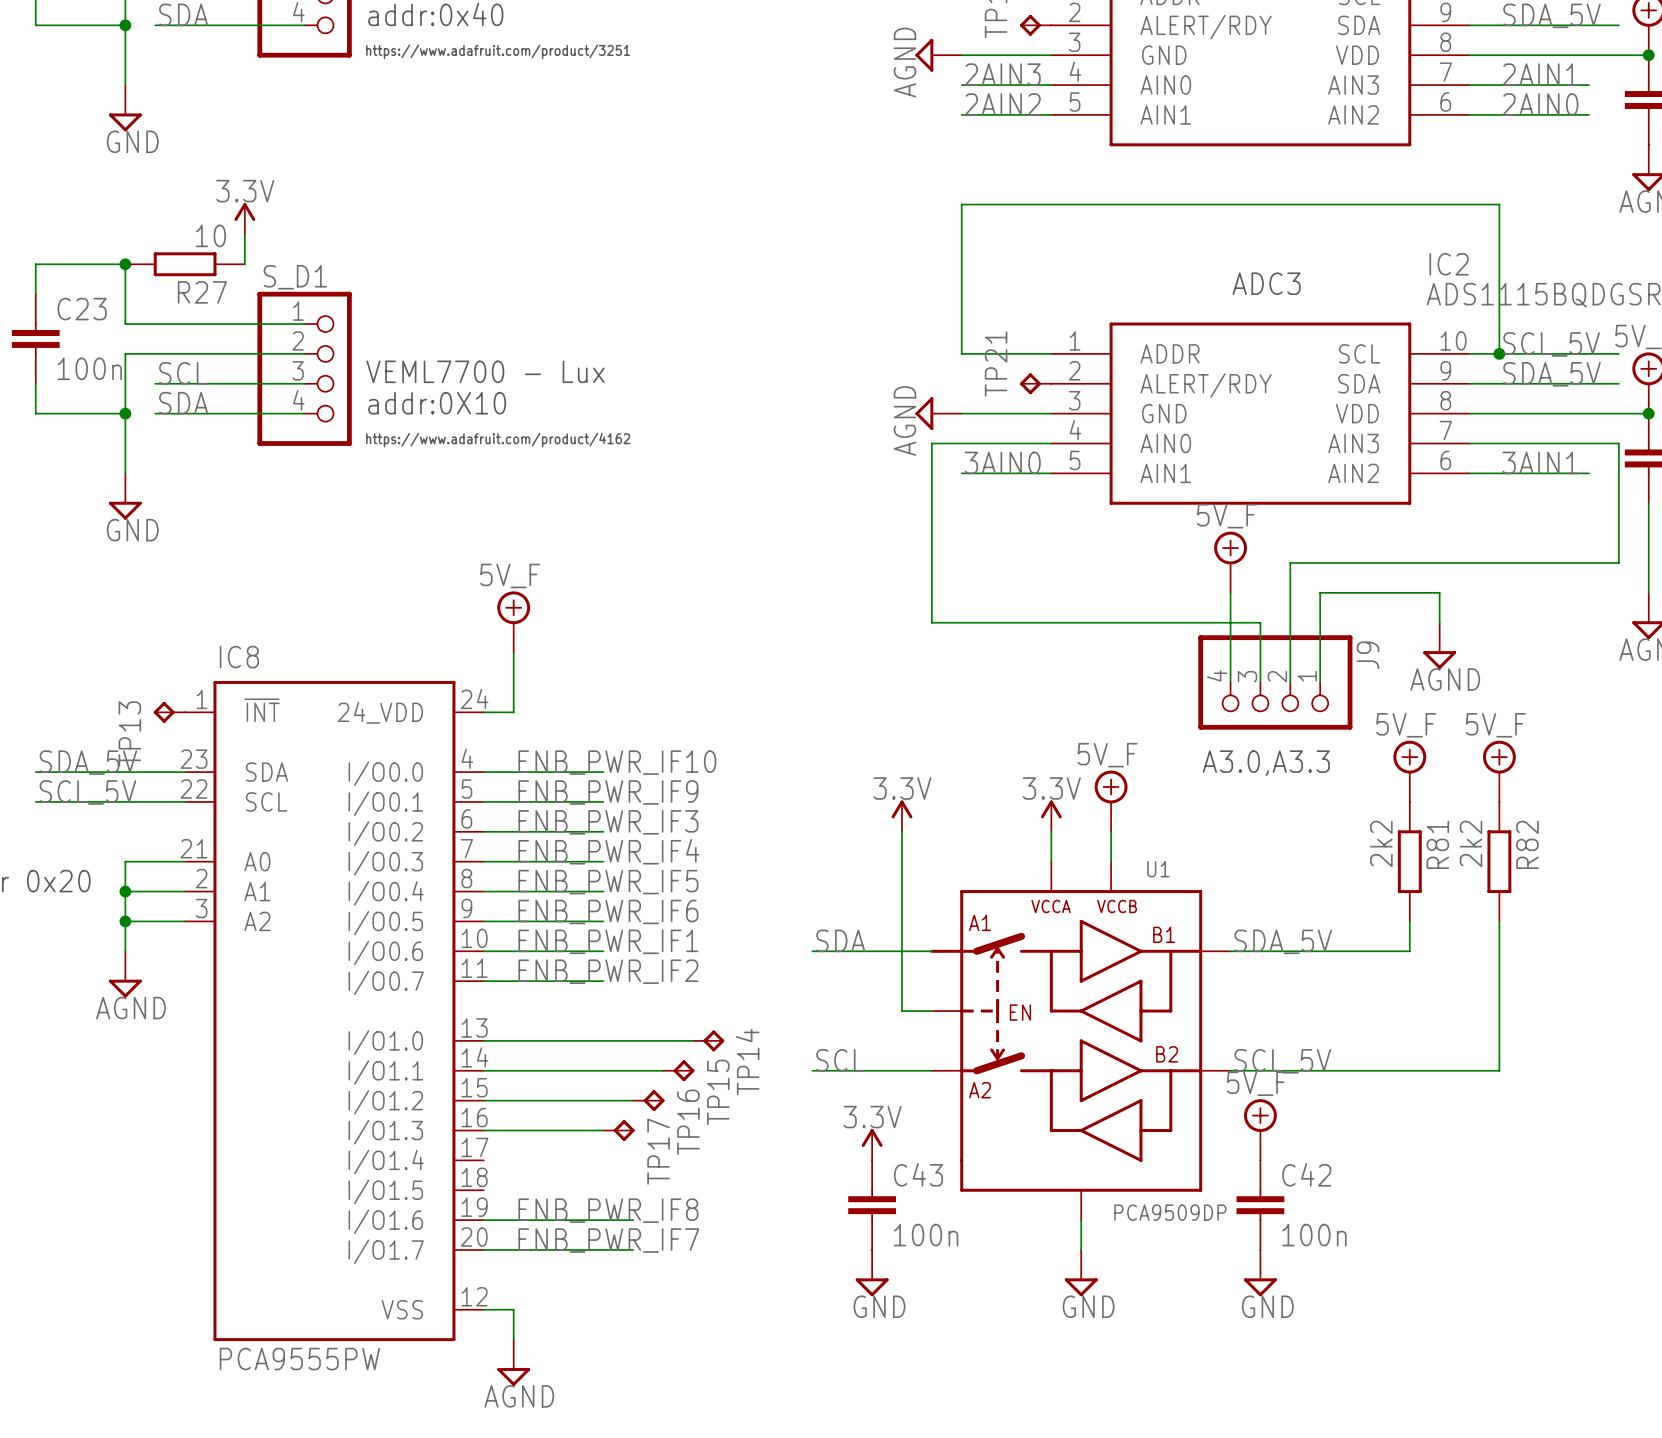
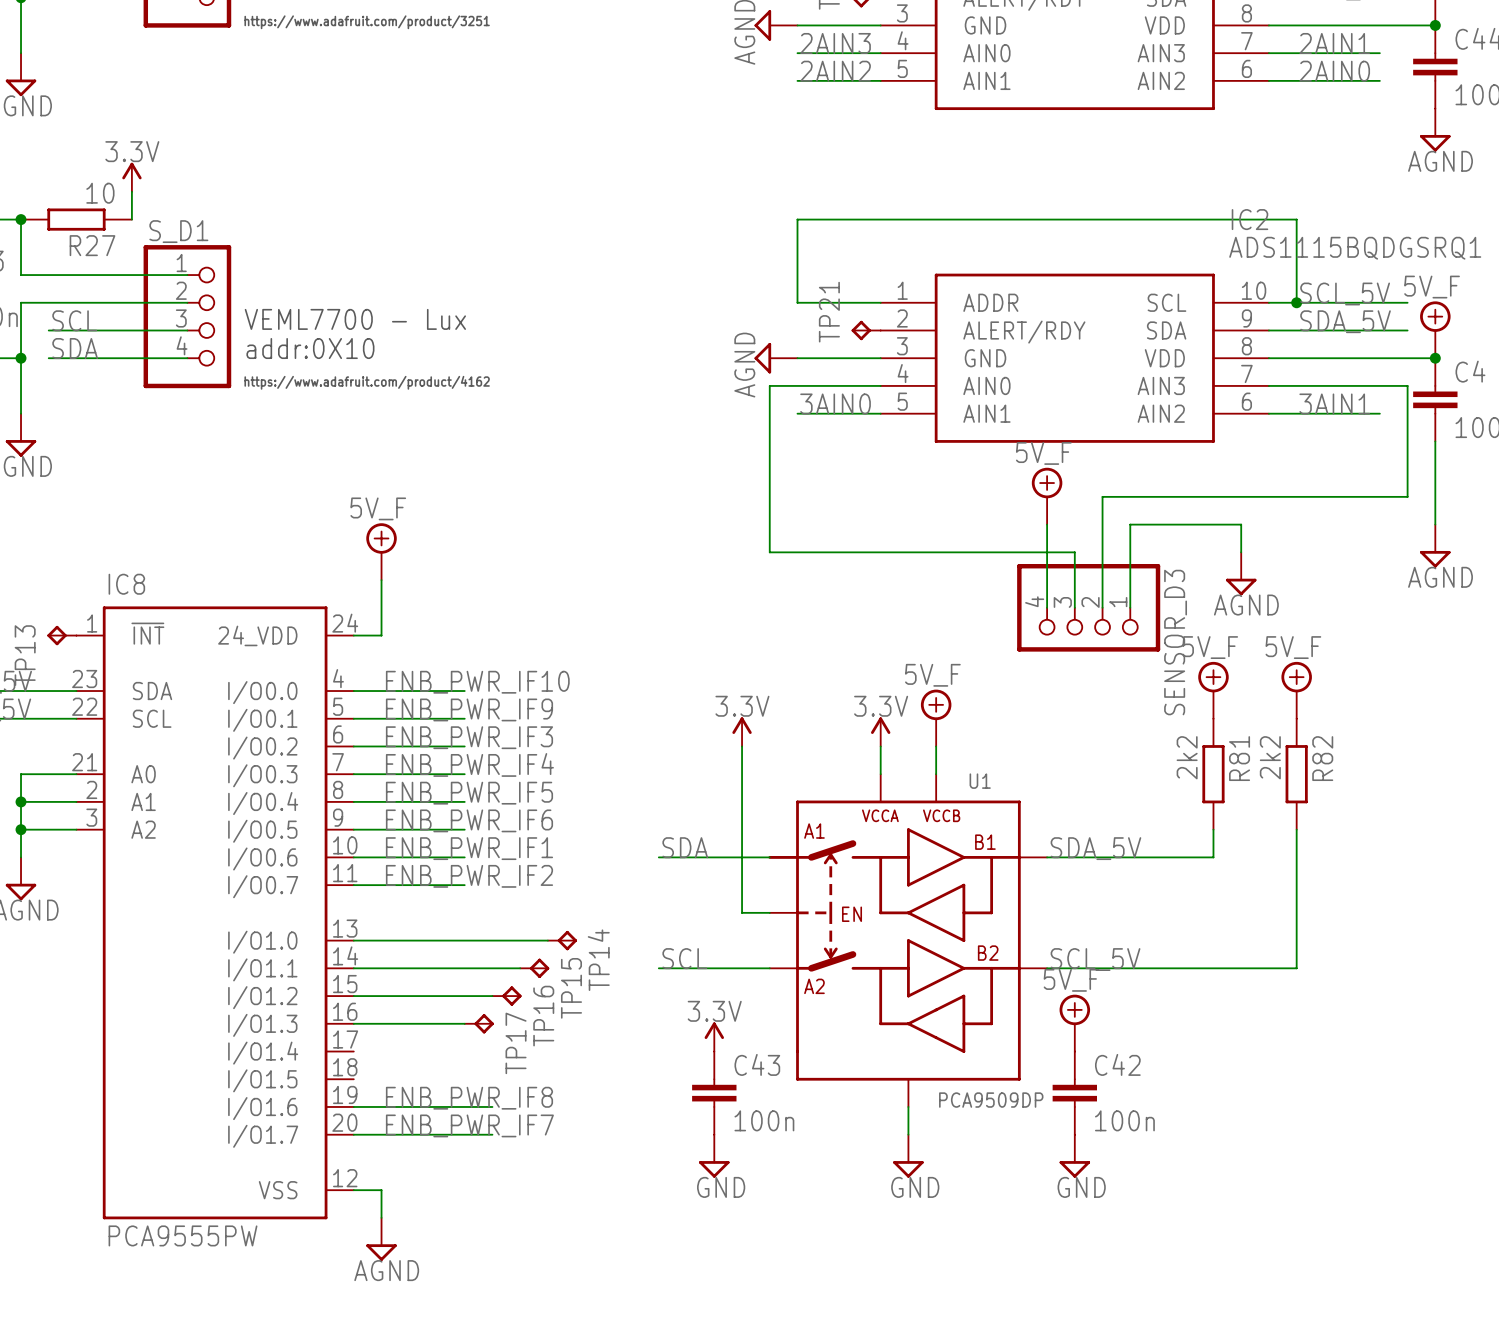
wire: (961, 264) (961, 204) (1499, 204) (1499, 264) -> (797, 219) (1296, 219)
text: ADC3 (1266, 283) -> none
J9 name: J9 (1367, 655) -> SENSOR_D3 (1175, 642)
text: A3.0,A3.3 (1266, 763) -> none

